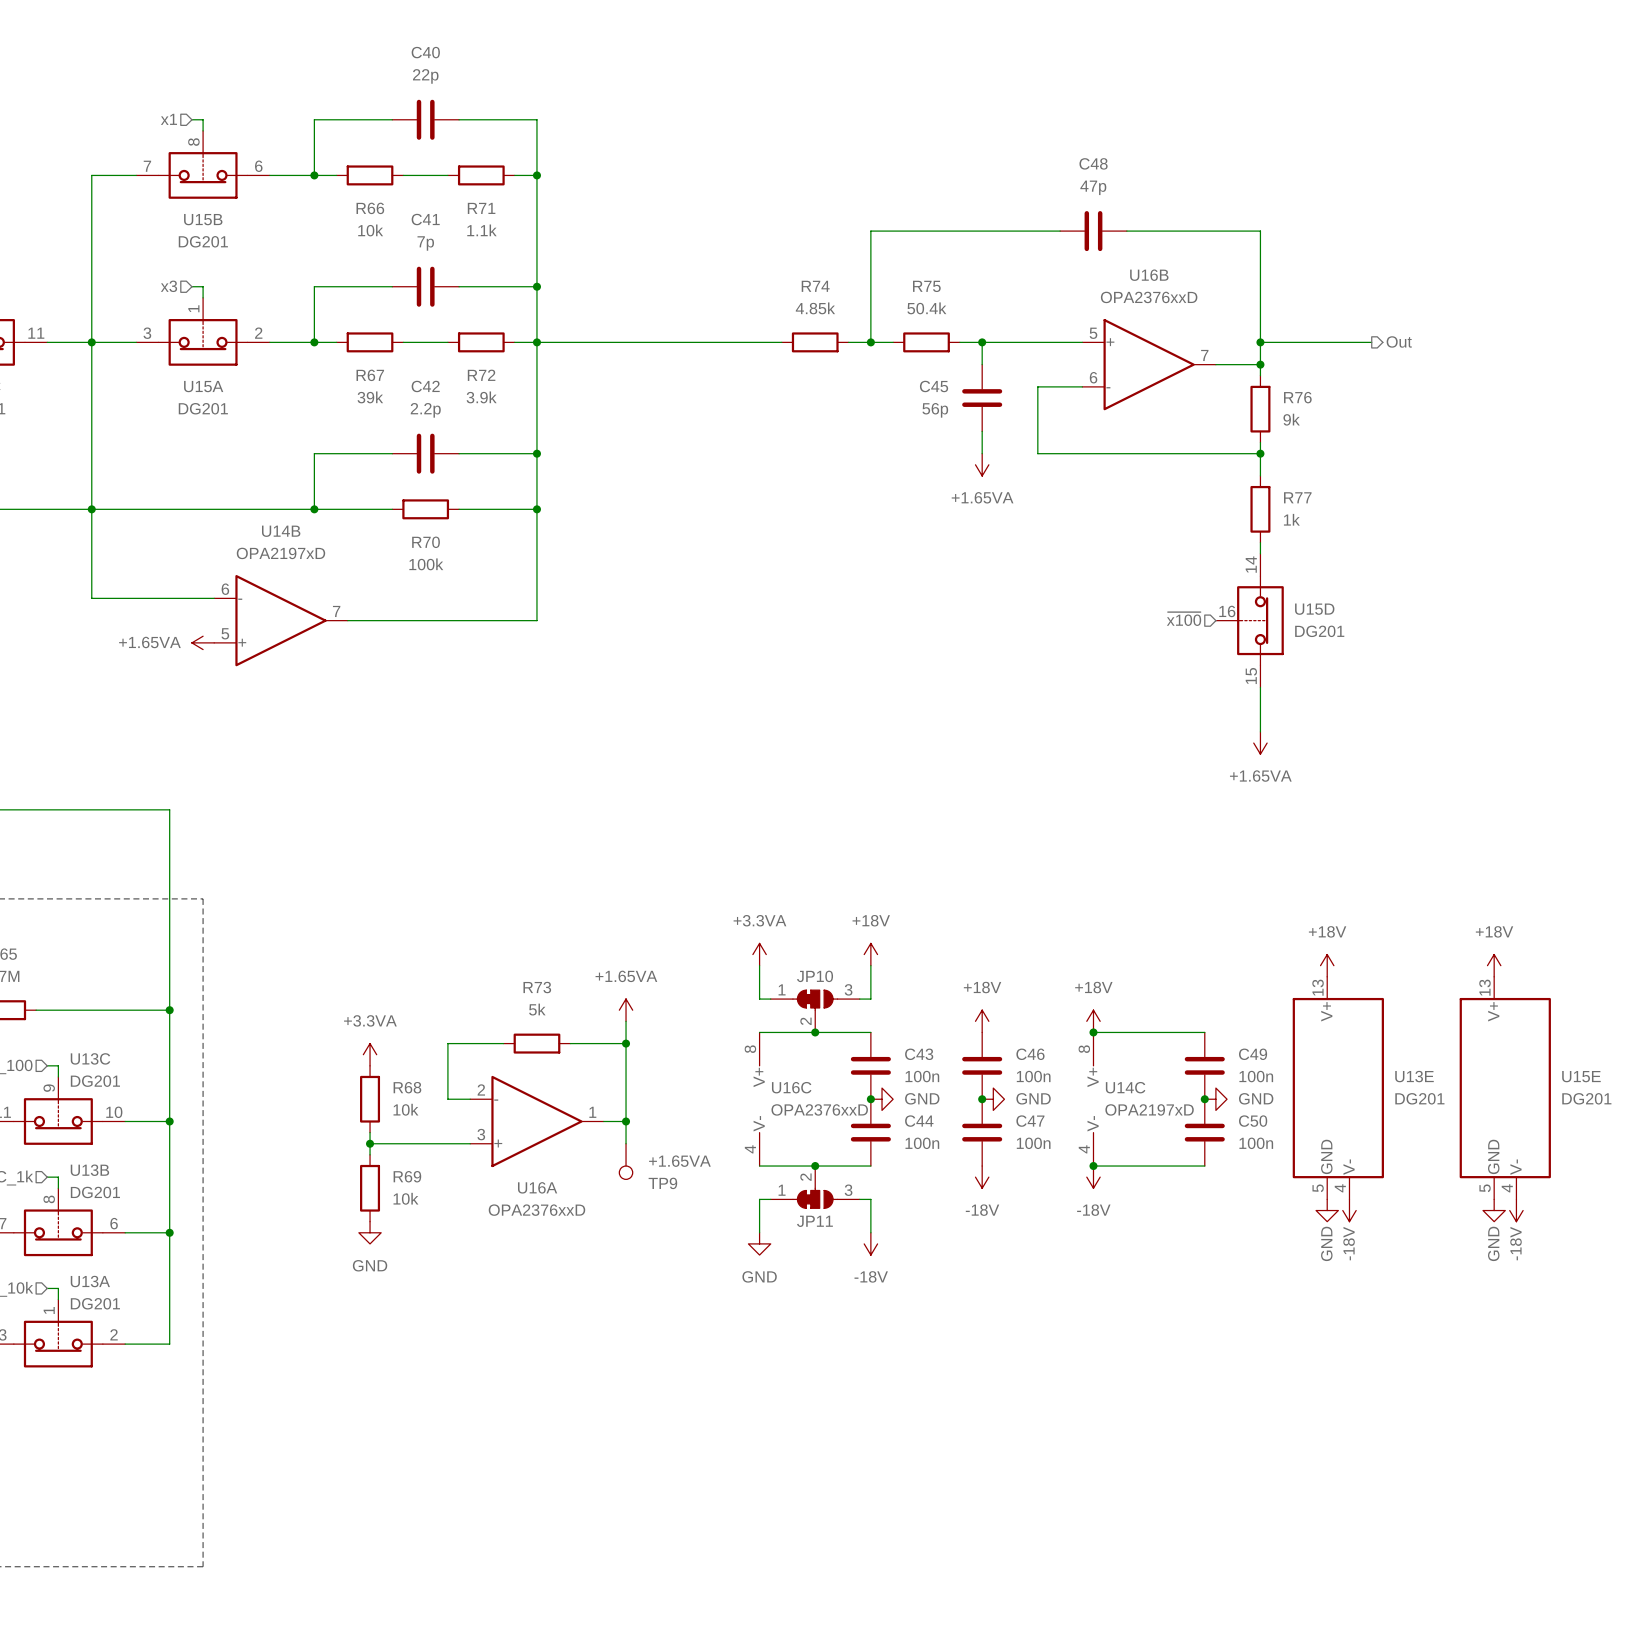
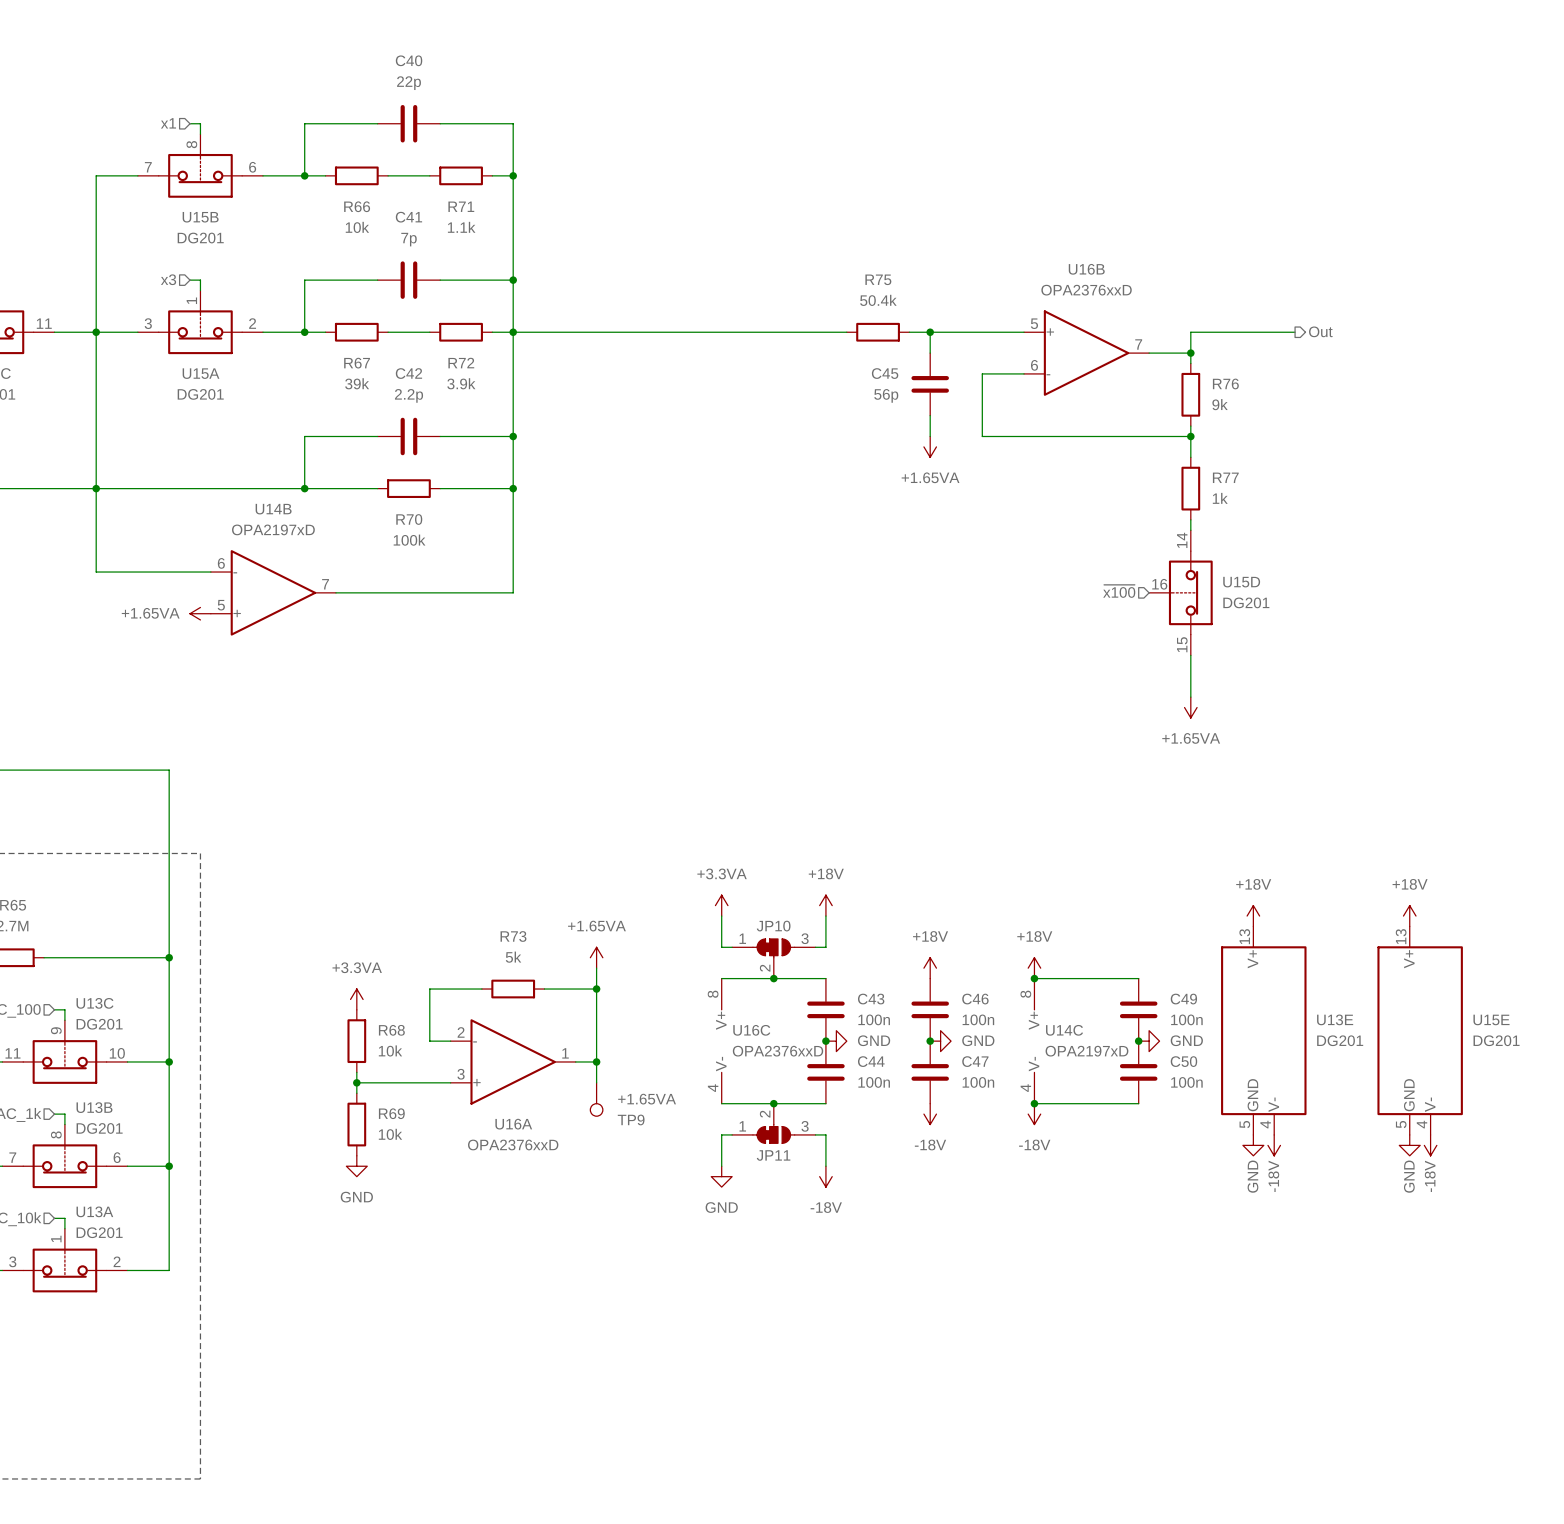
wire: (1060, 231) (870, 231) (870, 342) -> none
C48: 47p (1093, 231) -> none
wire: (1126, 231) (1260, 231) (1260, 342) -> none
wire: none -> (742, 332) (805, 332)
R74: 4.85k (815, 342) -> none
junction: (870, 342) -> none
junction: (1260, 342) -> none

